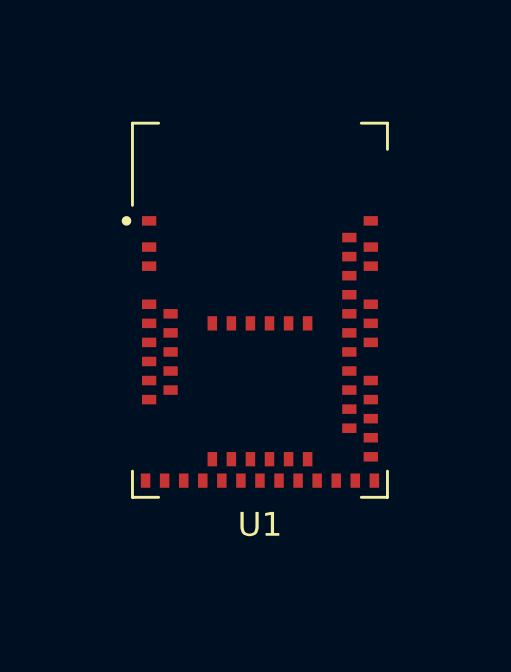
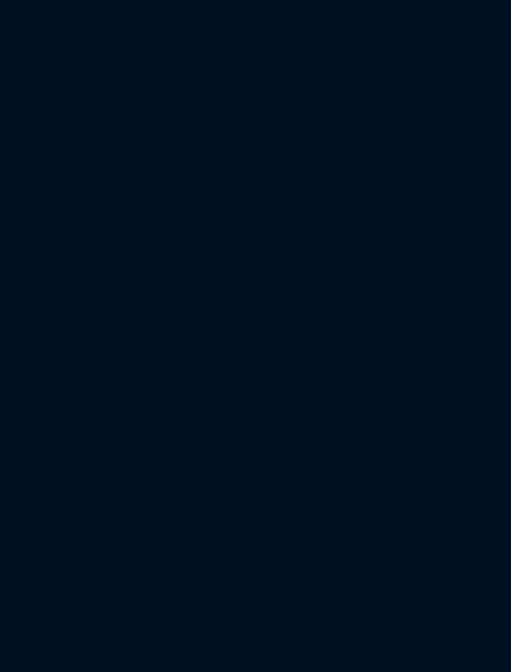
U1: (255, 310) -> none

